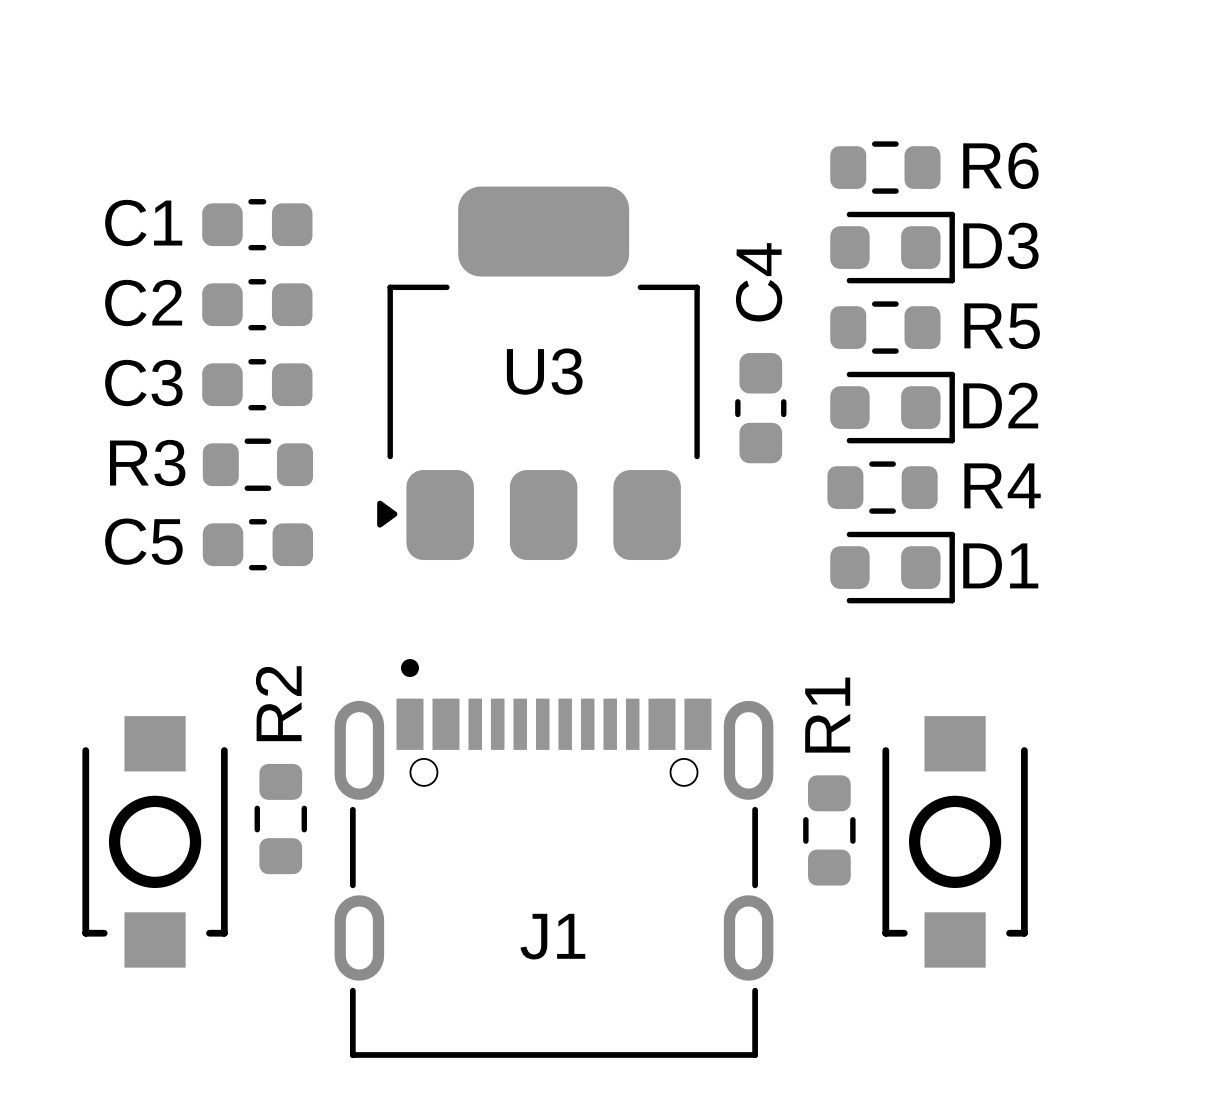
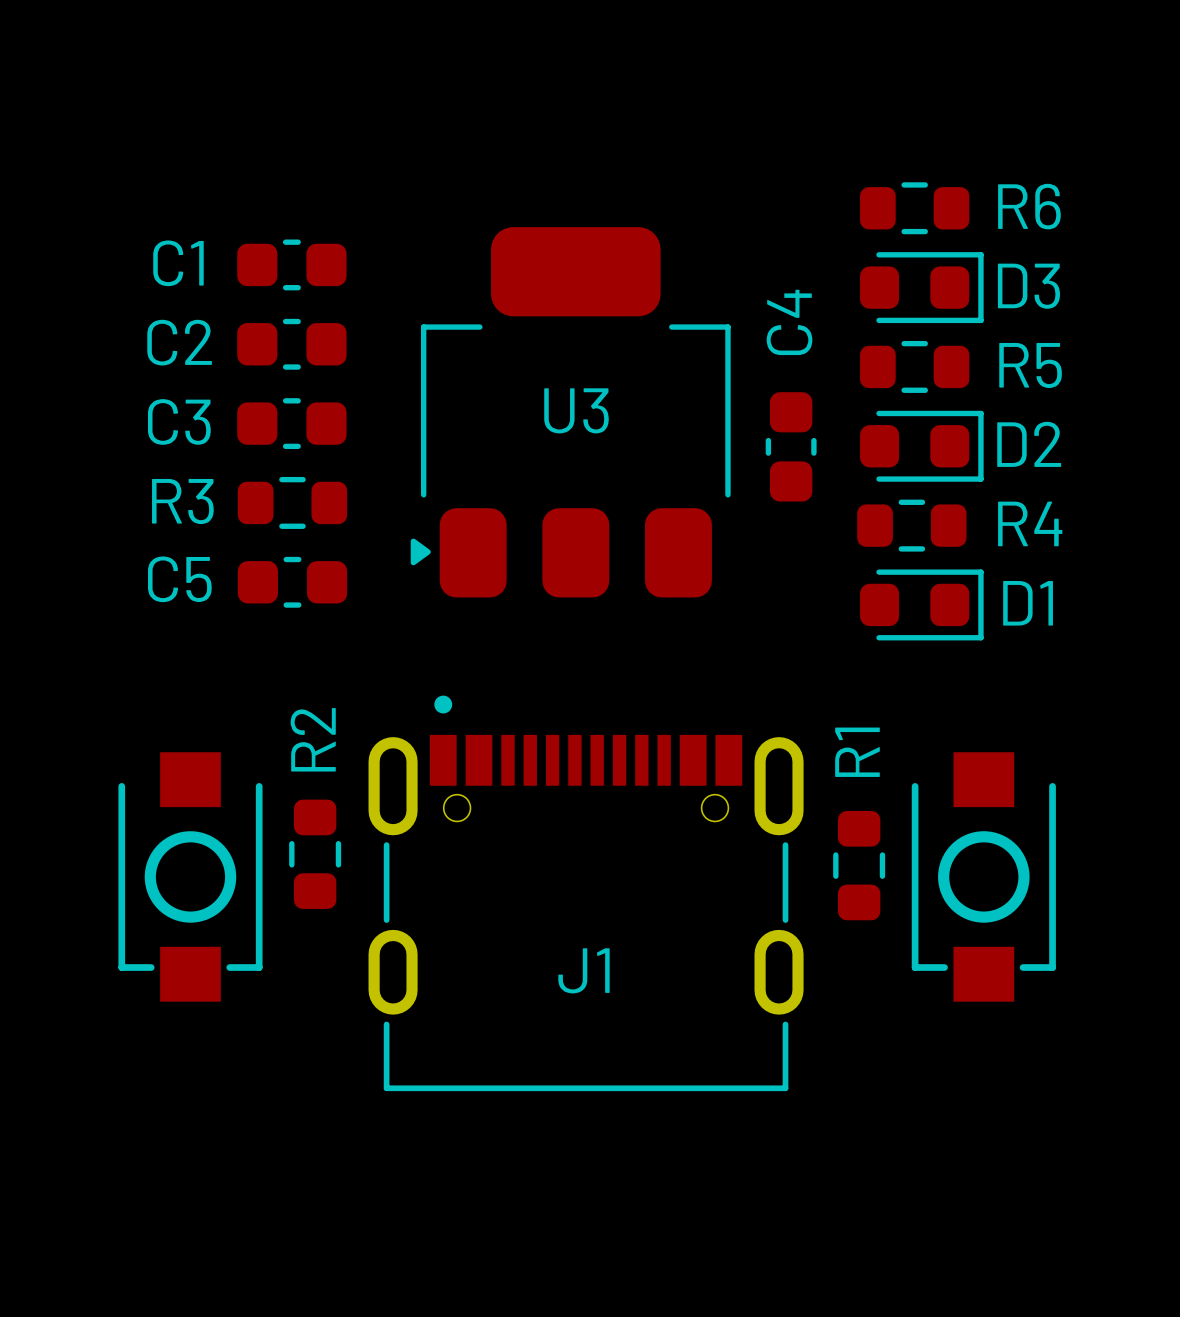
part footprint: [82, 716, 228, 968] -> [118, 752, 263, 1002]
part footprint: [882, 716, 1028, 968] -> [911, 752, 1056, 1002]

